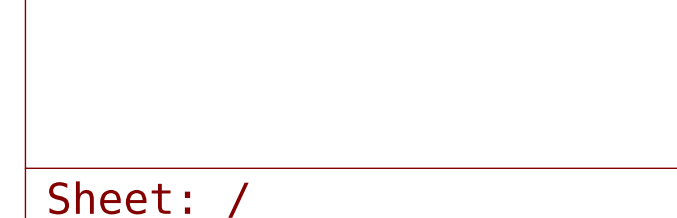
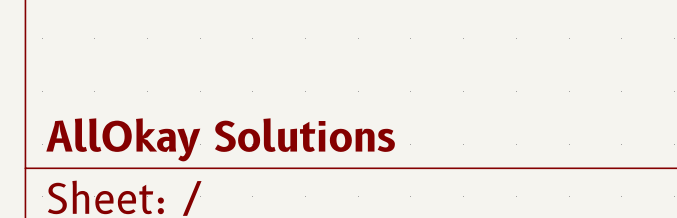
title block: none -> AllOkay Solutions (220, 139)

